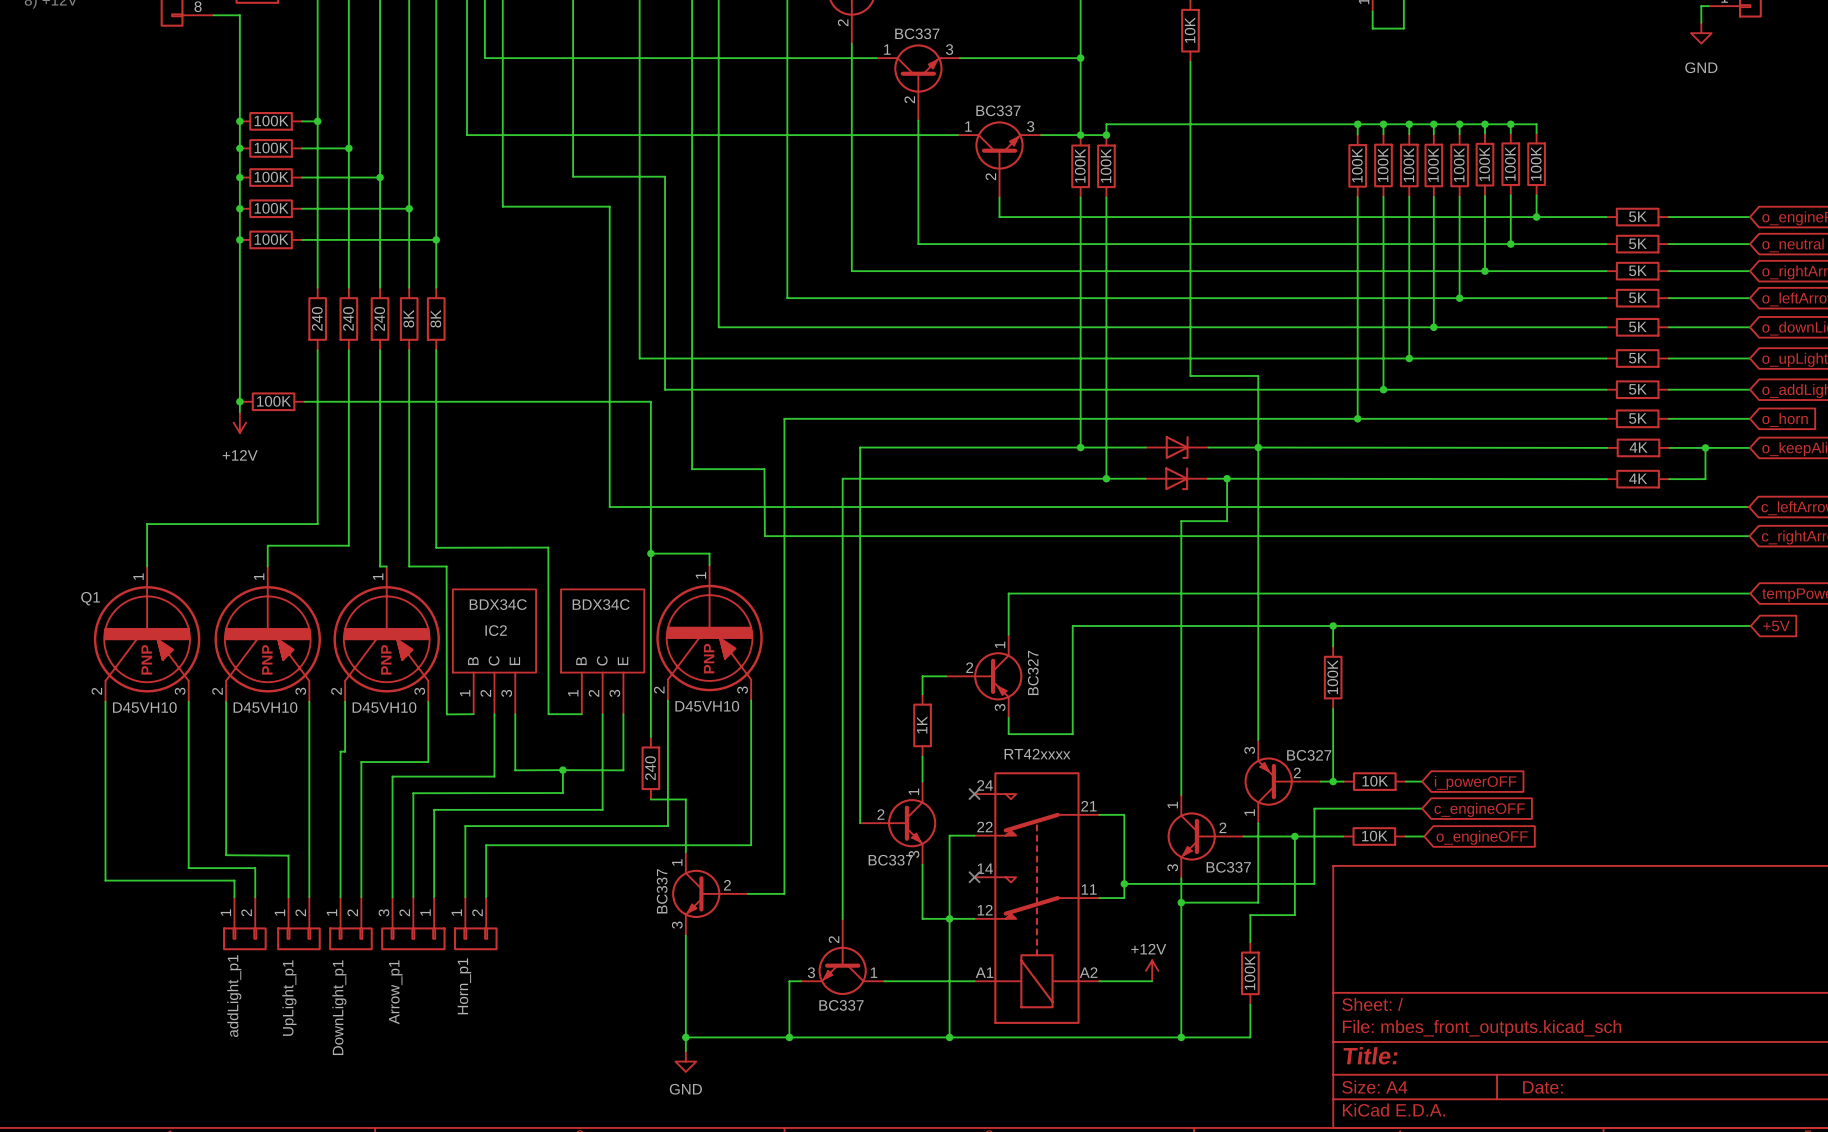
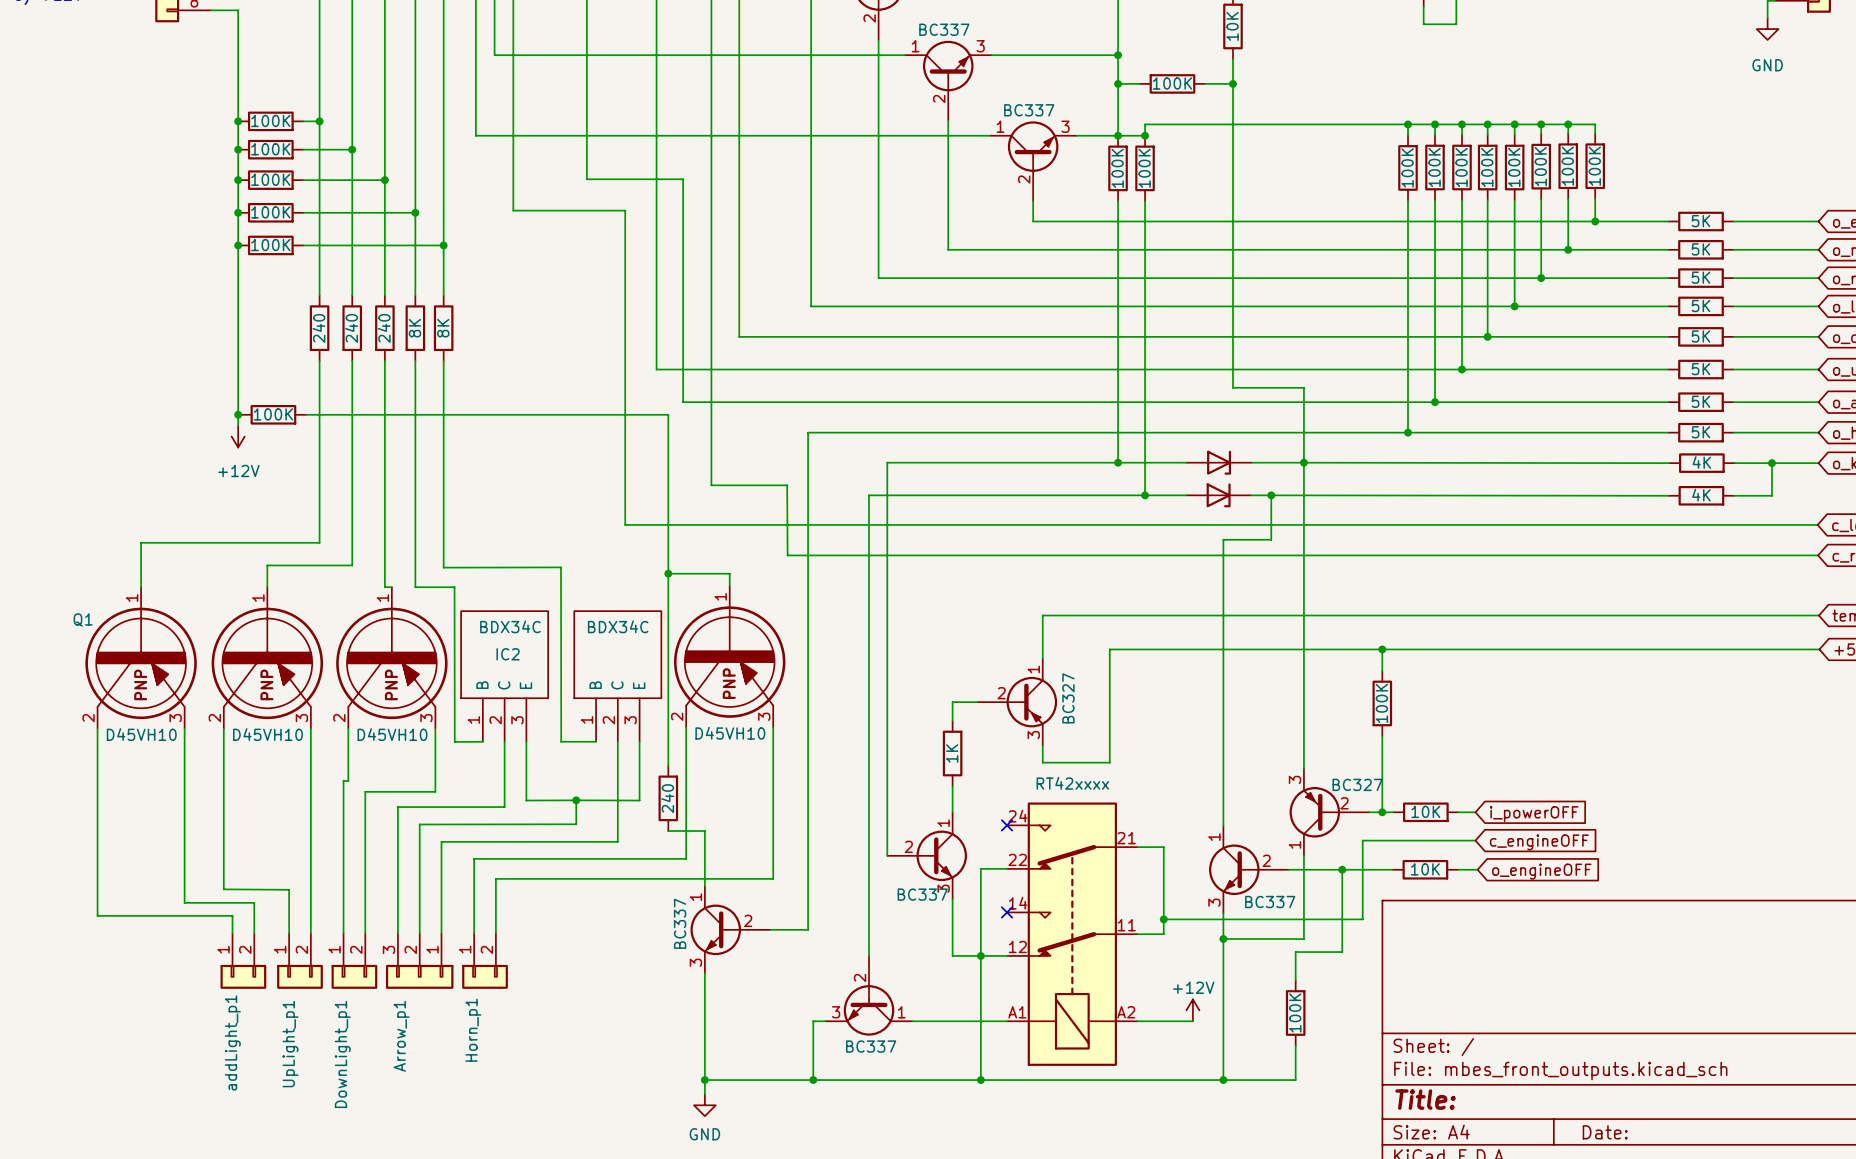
wire: none -> (1118, 83) (1139, 83)
junction: none -> (1118, 83)
part: none -> 100K (1172, 83)
wire: none -> (1205, 83) (1232, 83)
junction: none -> (1232, 83)

